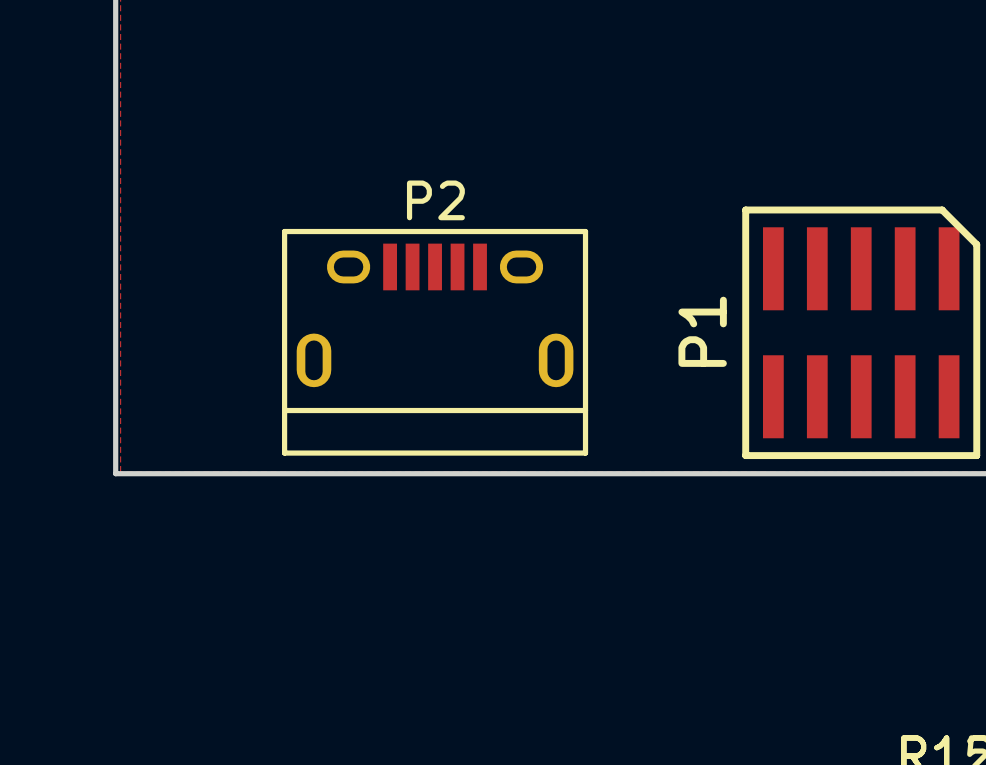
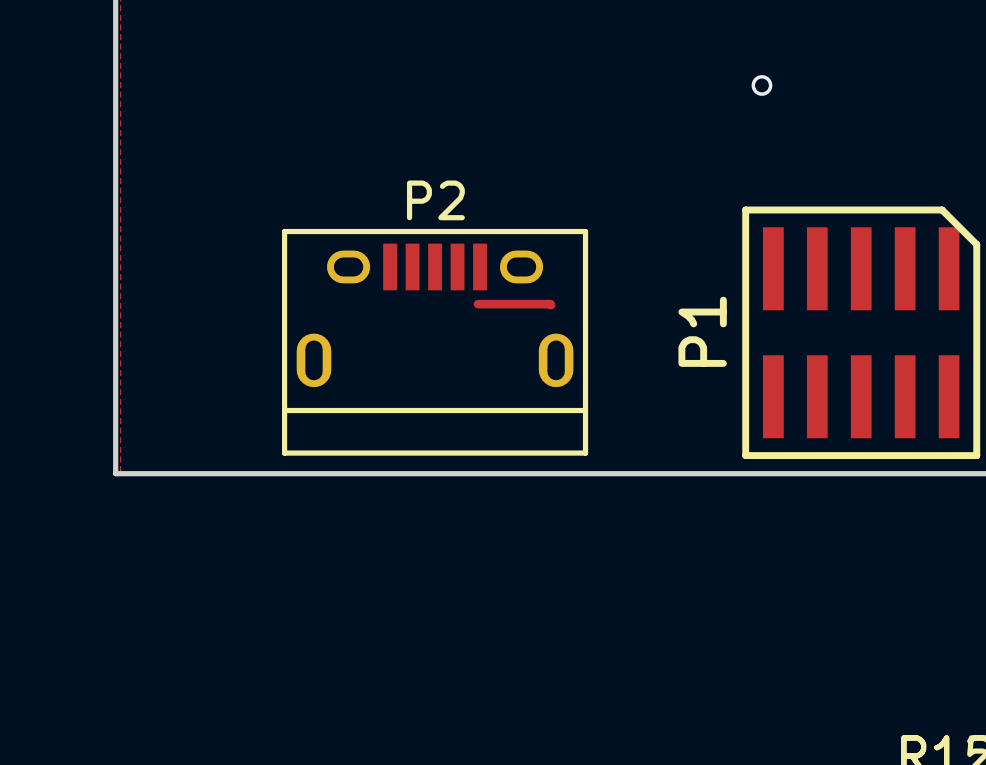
via: none -> (761, 85)
track: none -> (478, 304) (551, 305)

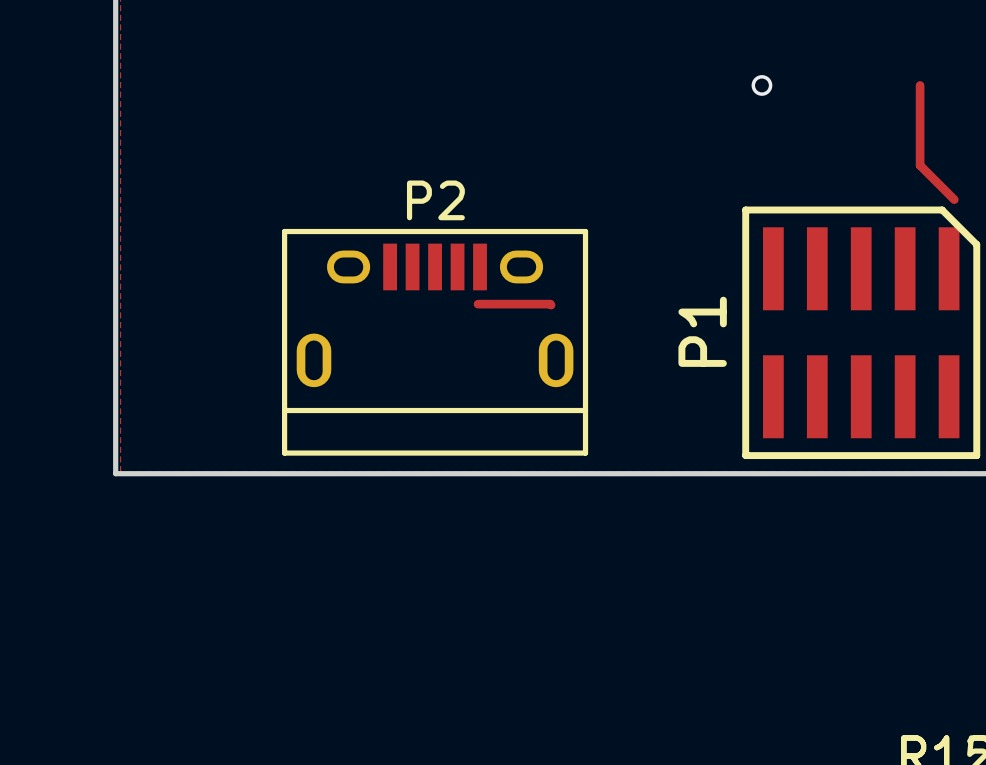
track: none -> (920, 85) (920, 165) (954, 199)

